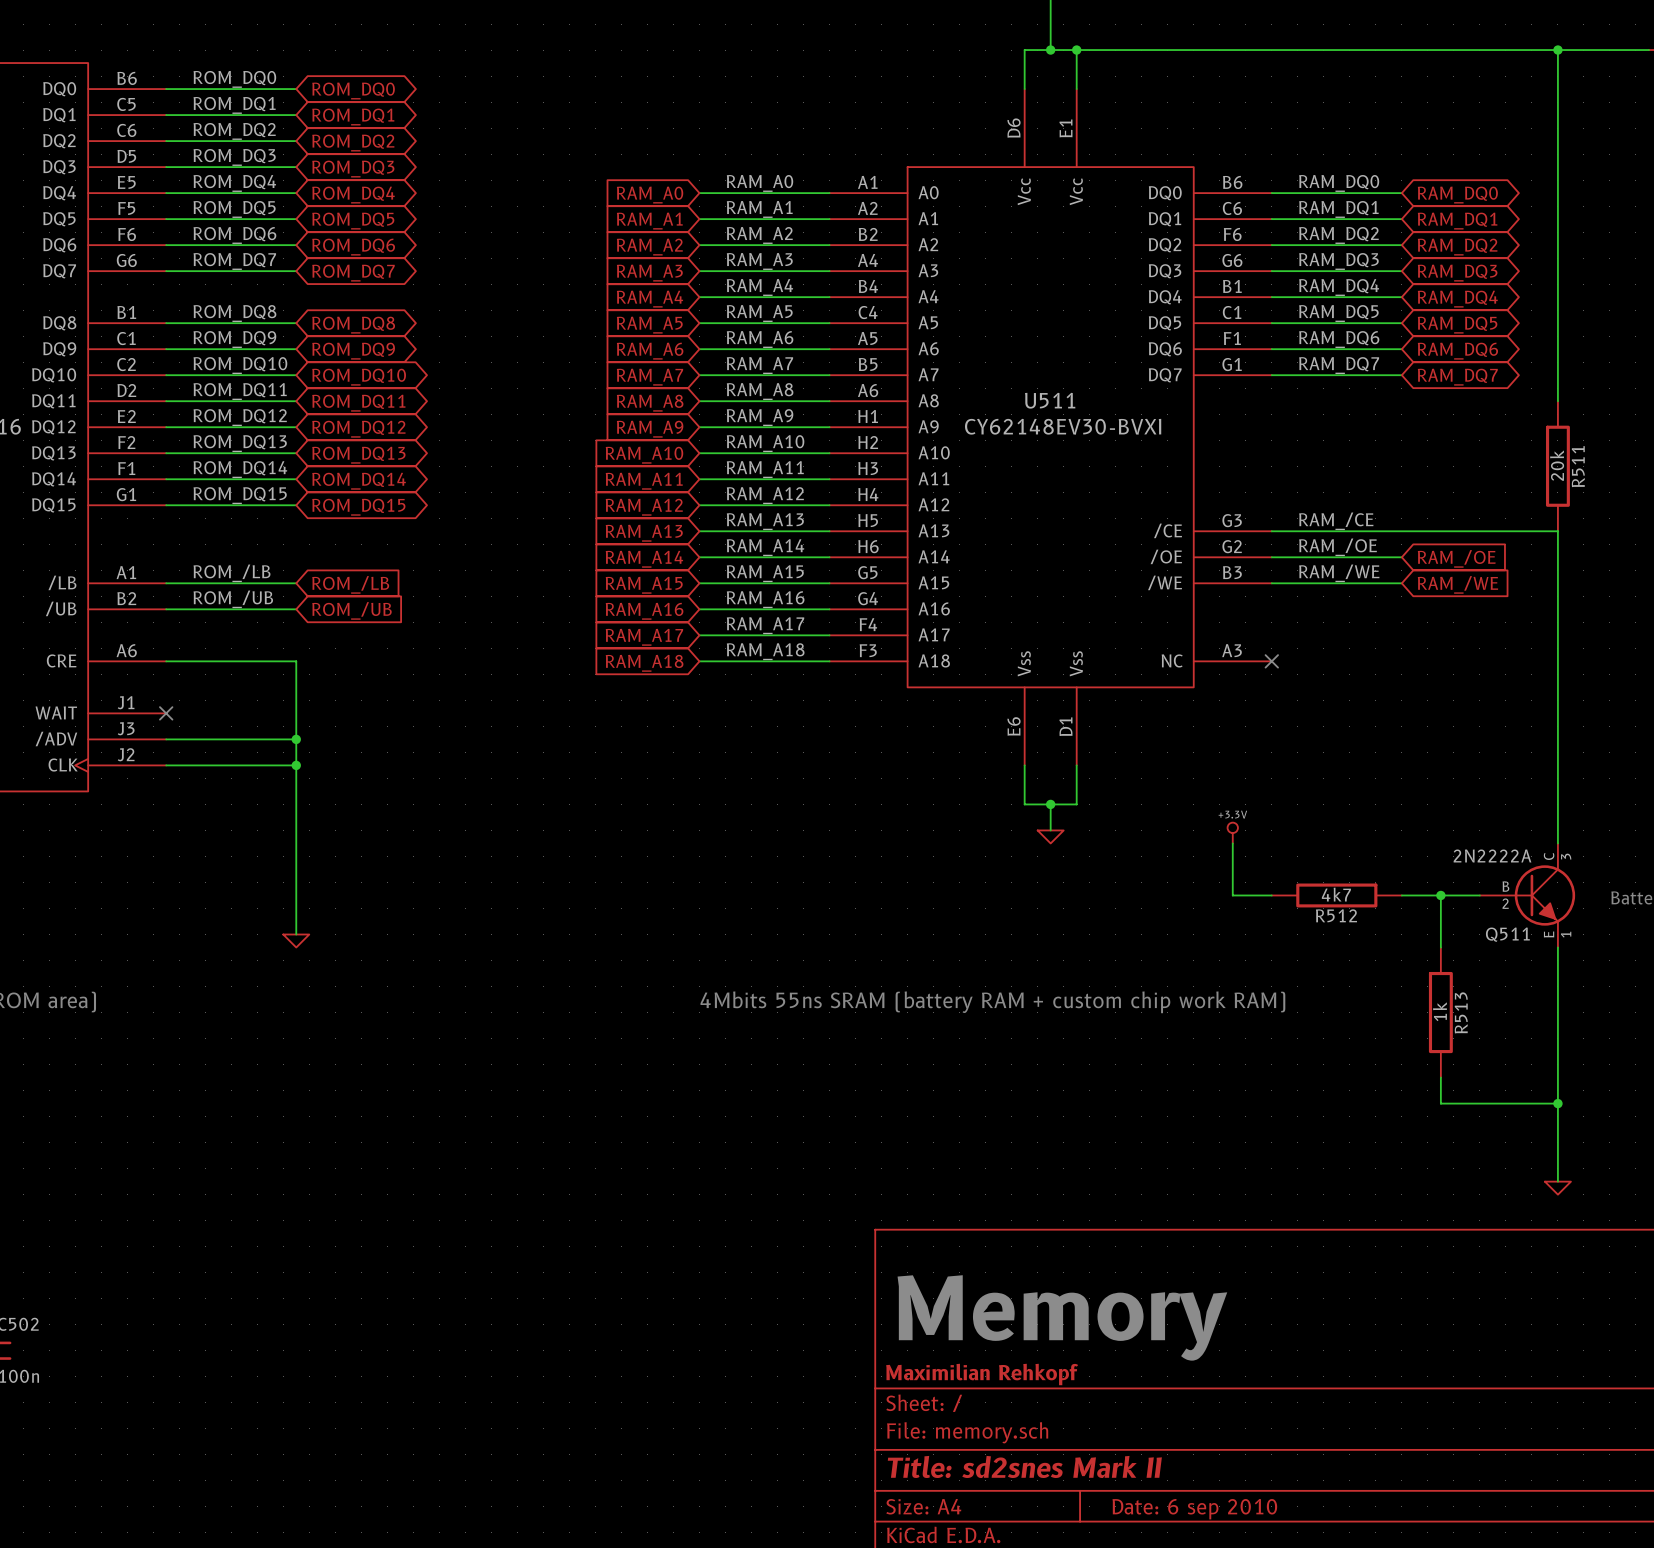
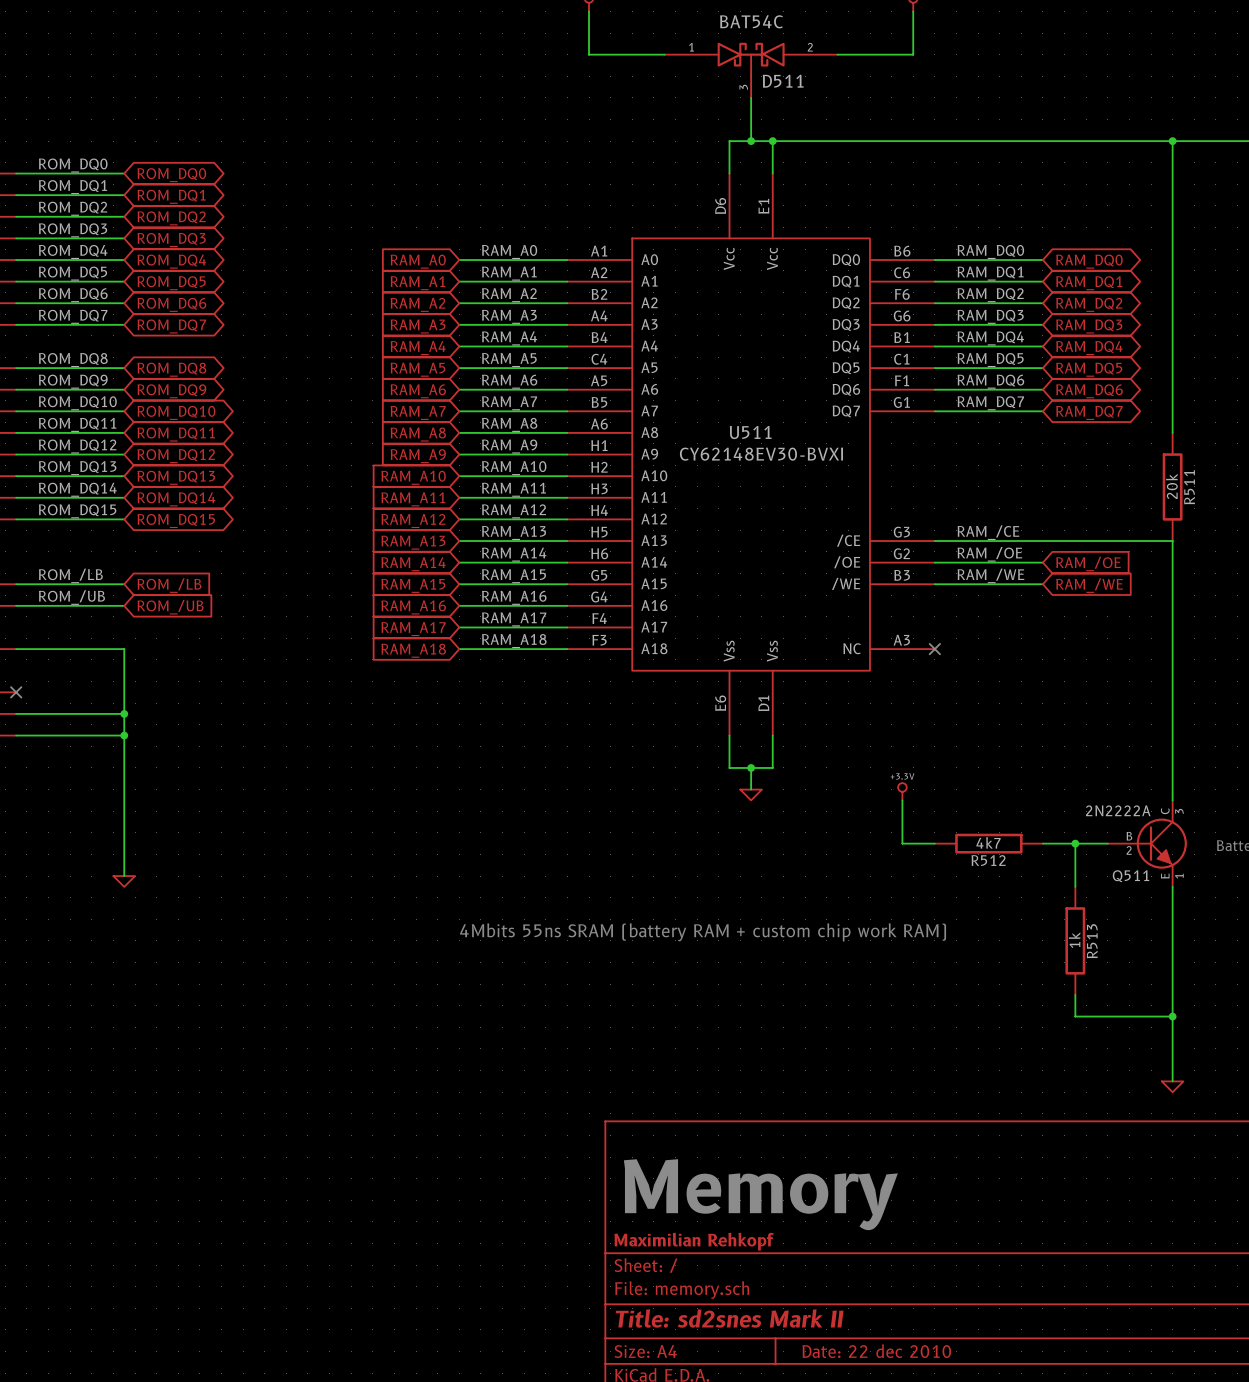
title block: Date: 6 sep 2010 (1194, 1509) -> Date: 22 dec 2010 (876, 1351)

